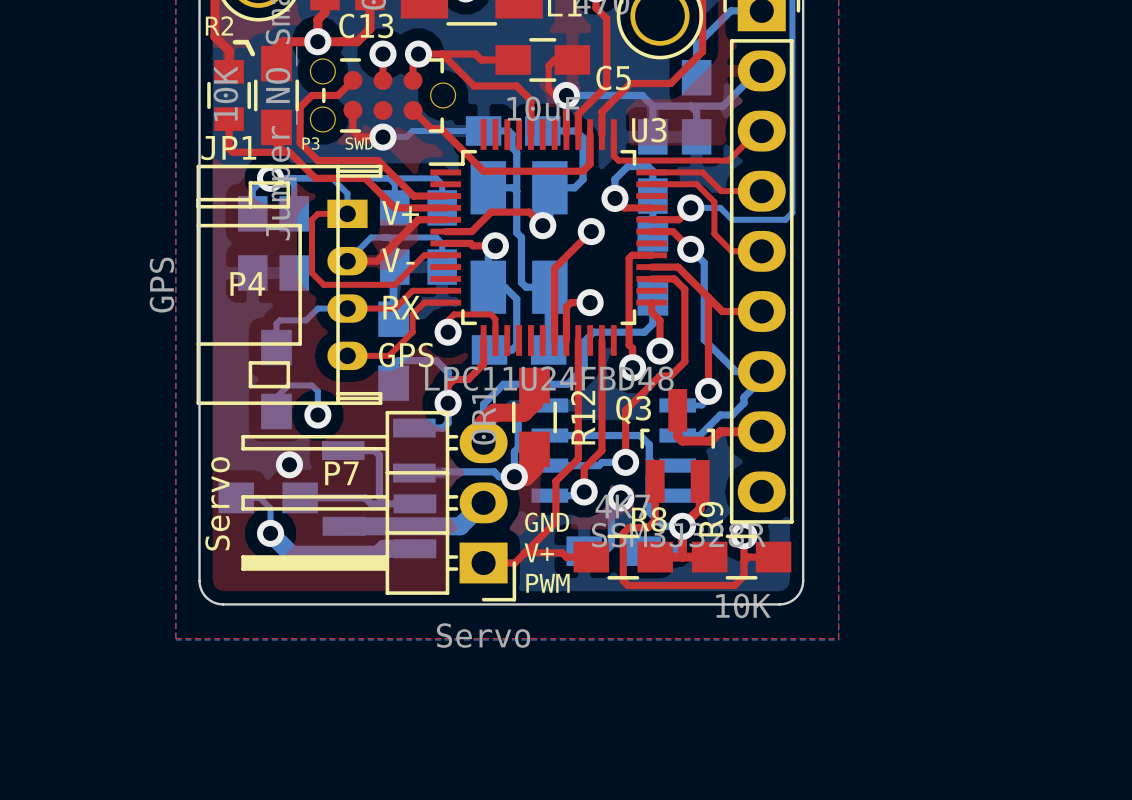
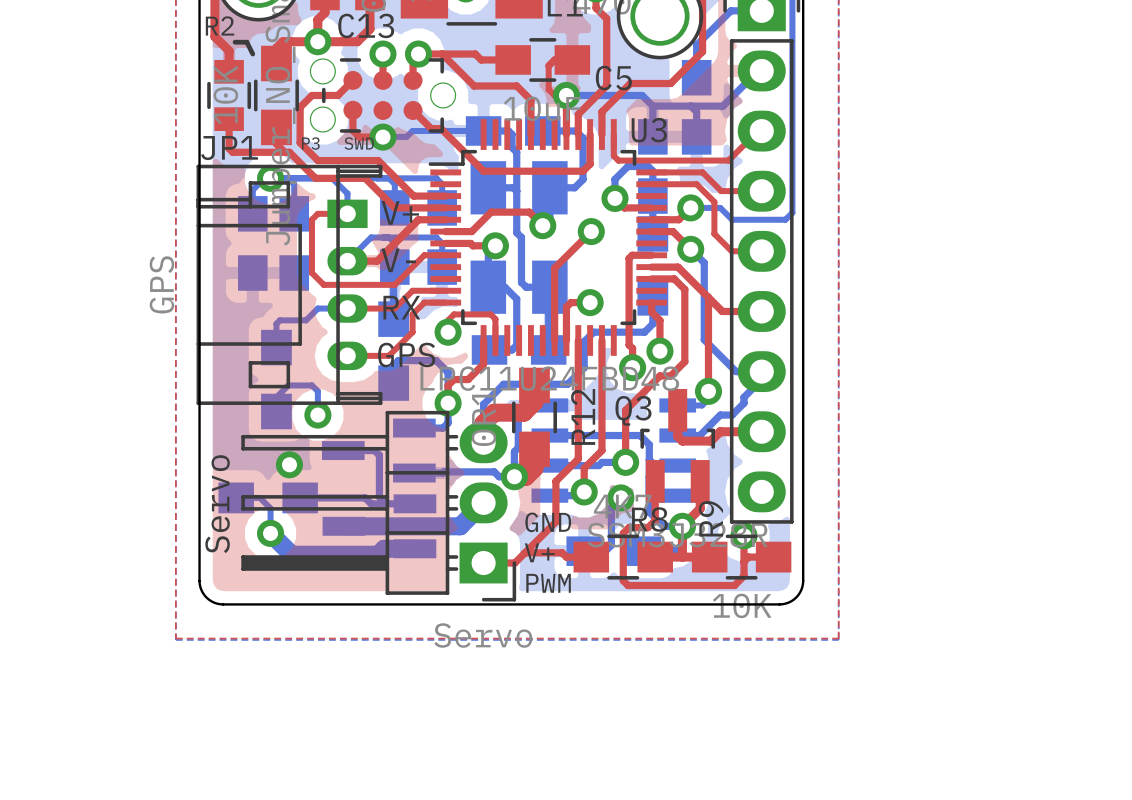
P4 name: P4 (247, 283) -> none
P7 name: P7 (341, 473) -> none

